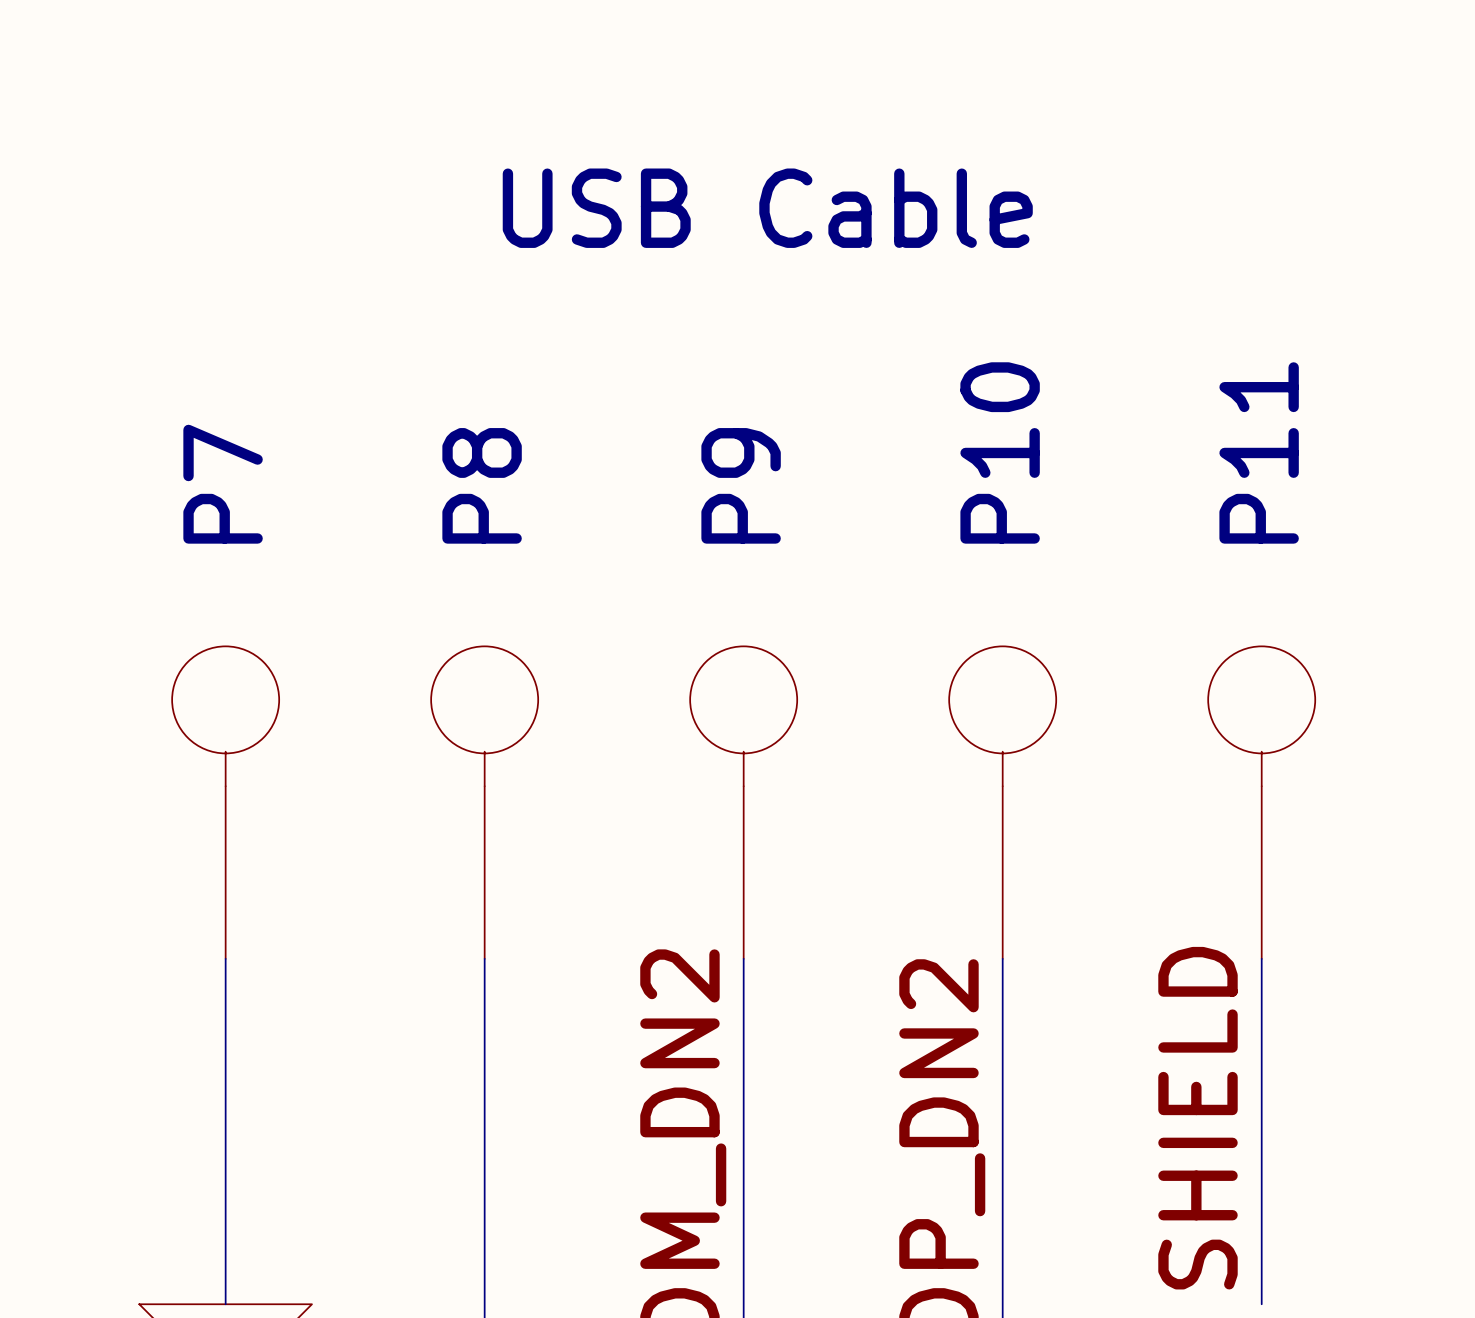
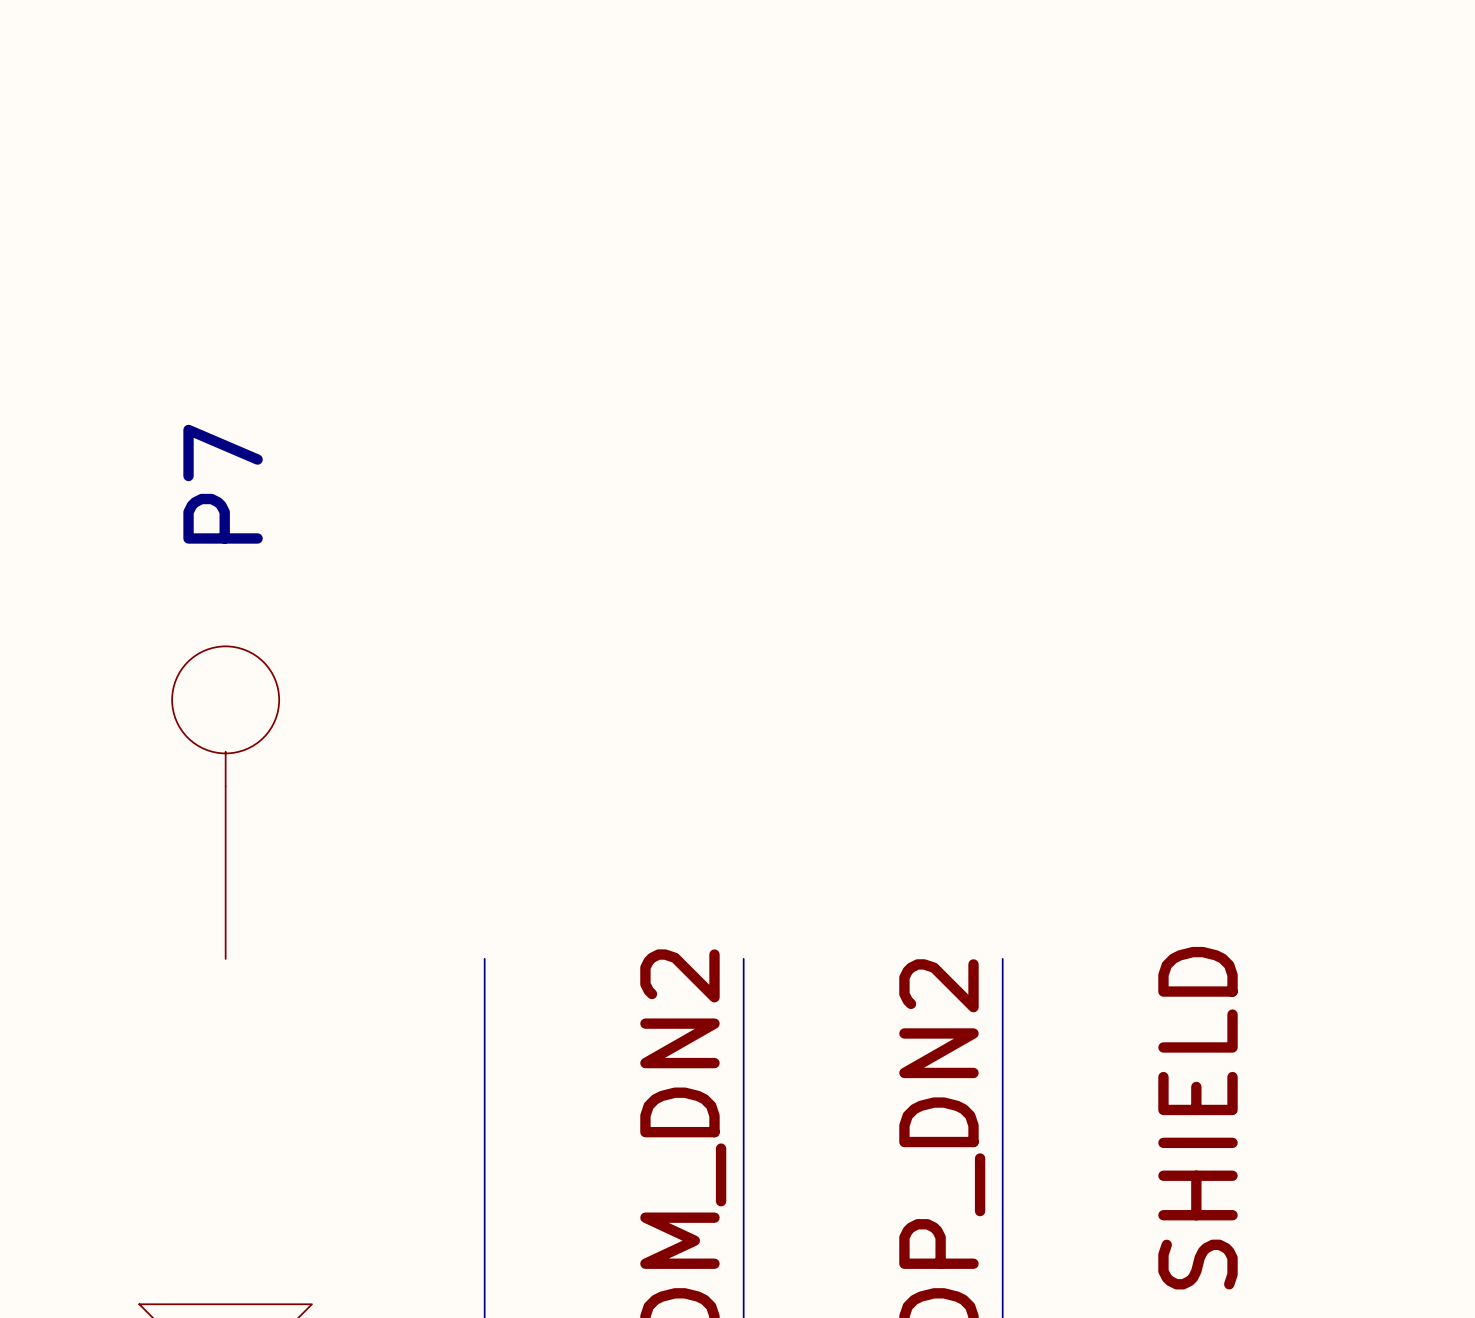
text: USB Cable (767, 208) -> none
P8: (484, 802) -> none
P9: (743, 802) -> none
P10: (1002, 802) -> none
P11: (1261, 802) -> none
wire: (225, 958) (225, 1304) -> none
wire: (1261, 958) (1261, 1304) -> none

